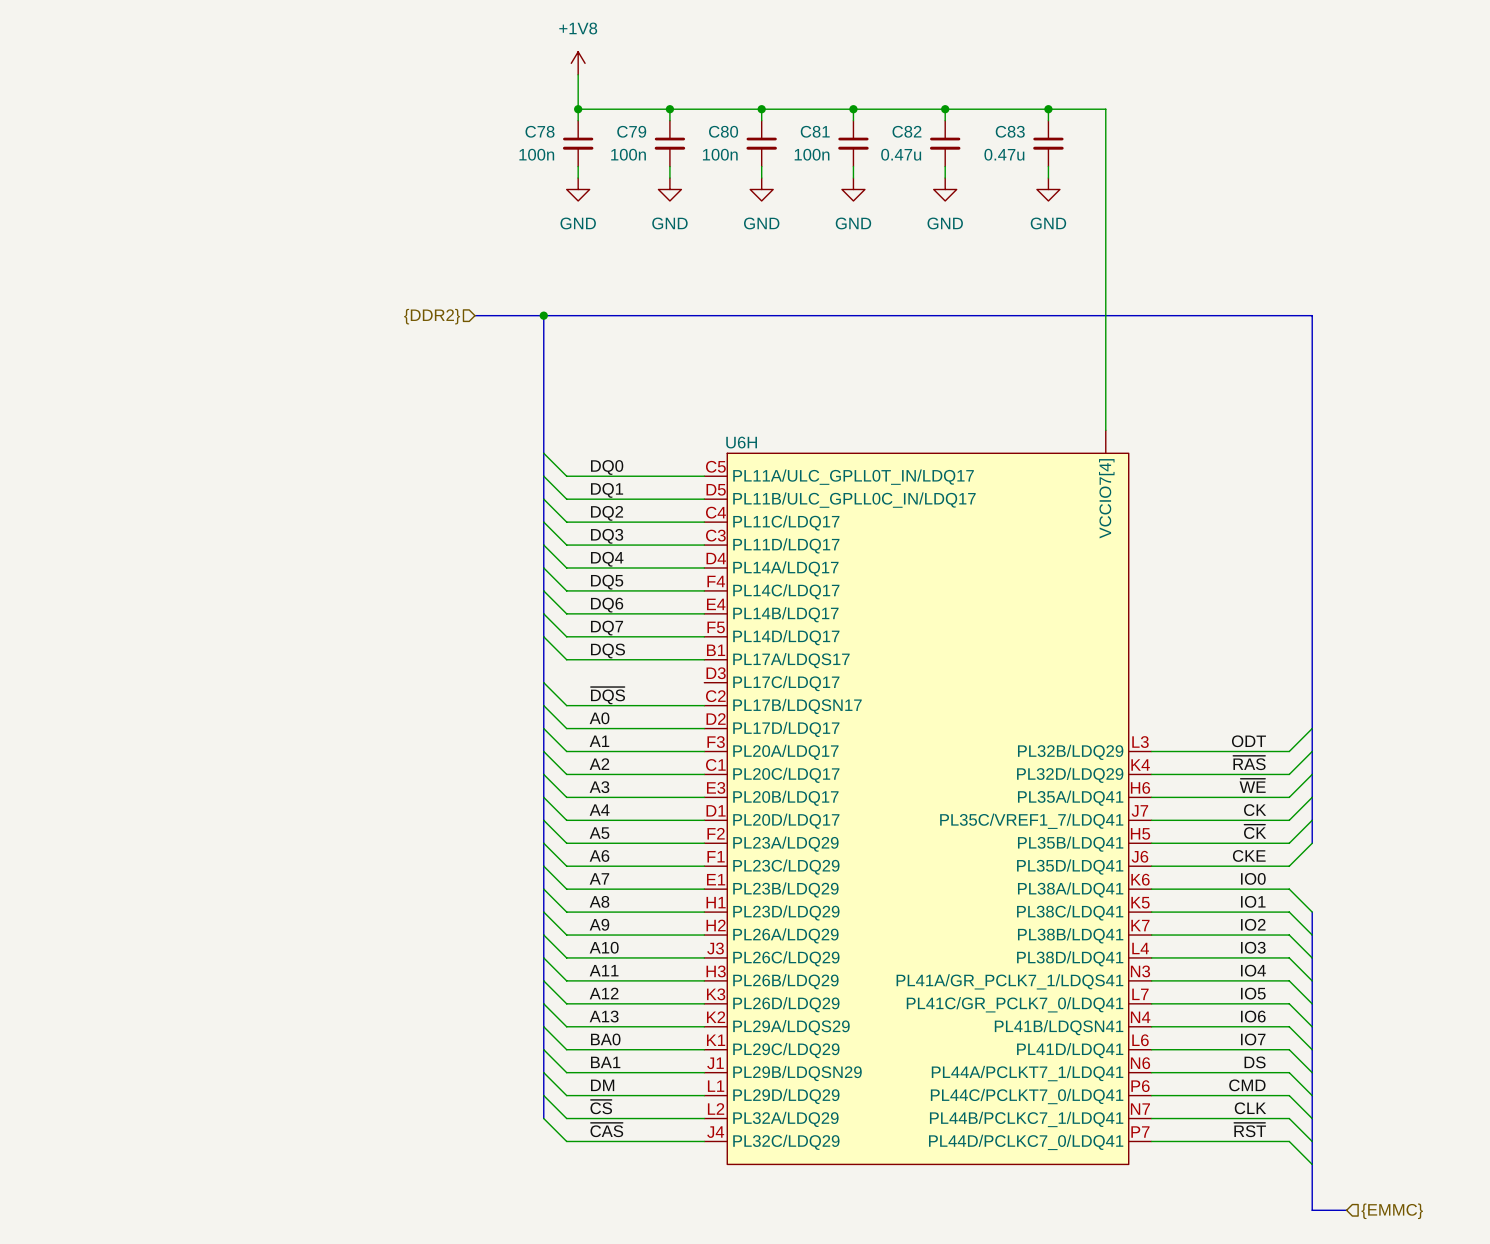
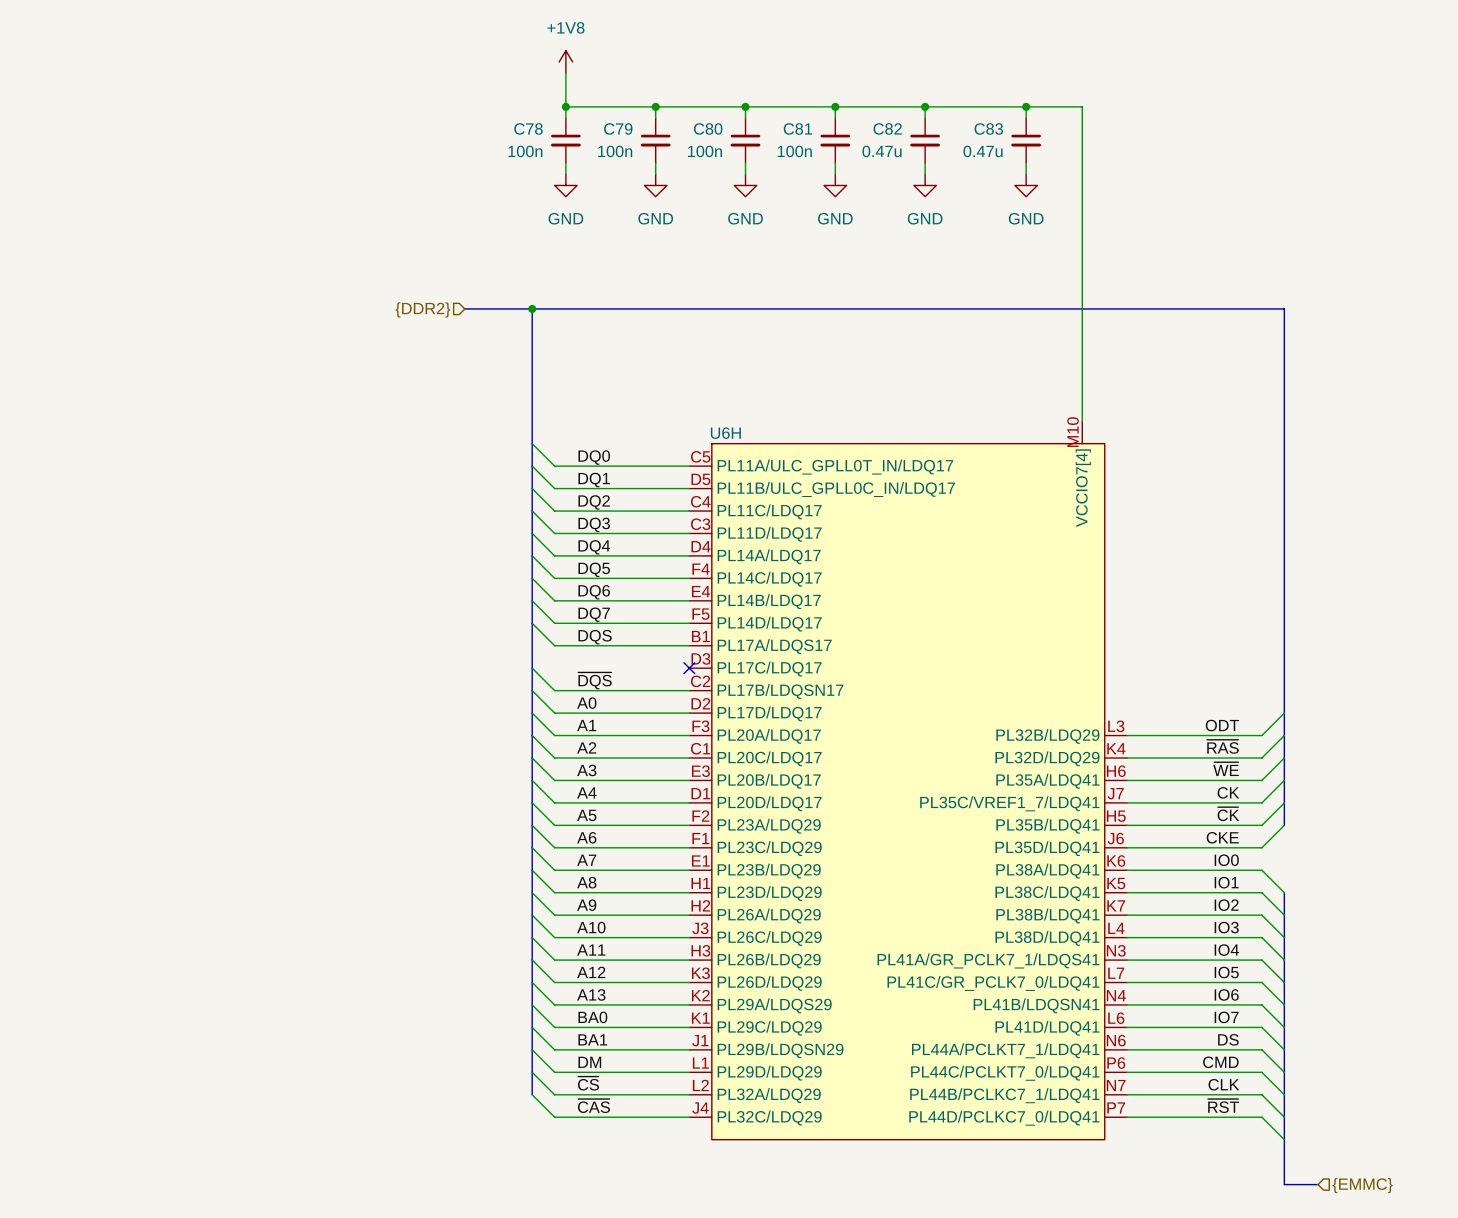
U6H pin number: none -> M10 (1073, 432)
no-connect mark: none -> (689, 668)

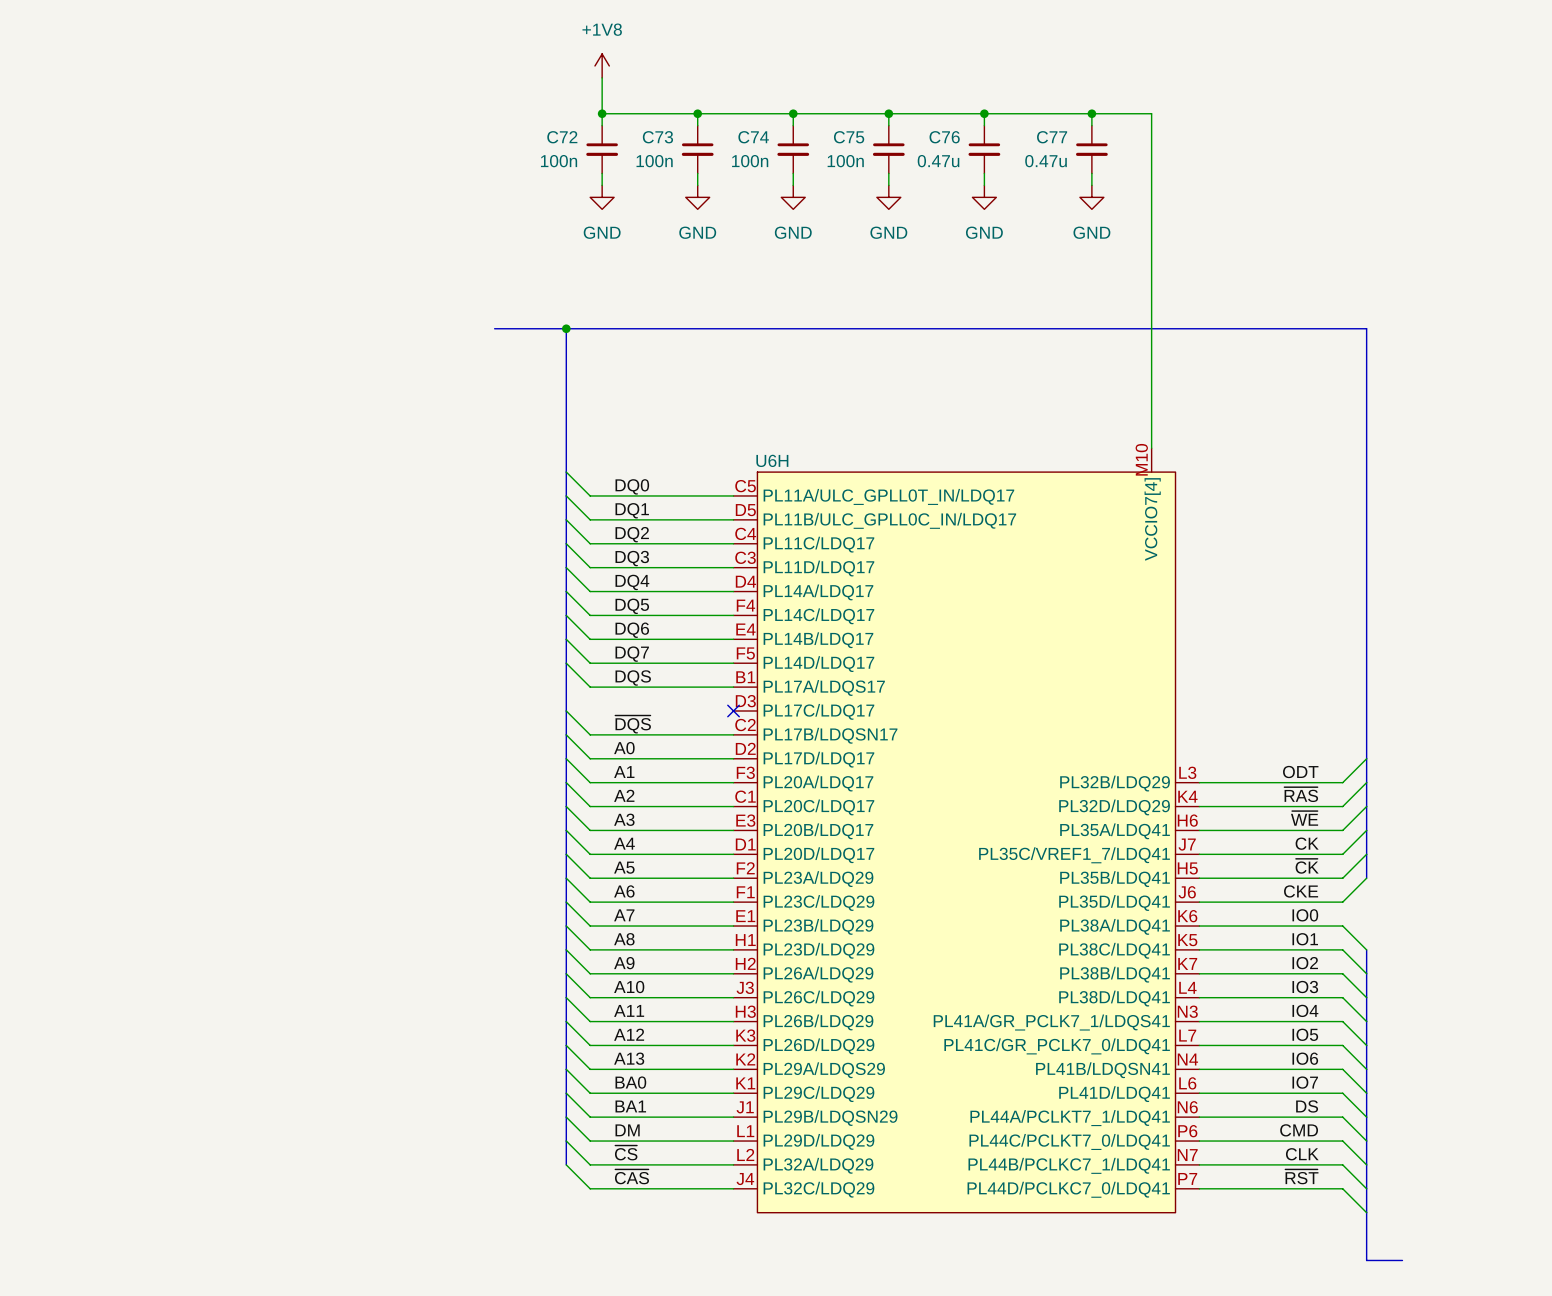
C78 name: C78 (528, 128) -> C72 (562, 137)
C79 name: C79 (618, 128) -> C73 (657, 137)
C80 name: C80 (708, 128) -> C74 (753, 137)
C81 name: C81 (797, 128) -> C75 (849, 137)
C82 name: C82 (887, 128) -> C76 (944, 137)
C83 name: C83 (988, 128) -> C77 (1052, 137)
hierarchical label: {DDR2} (422, 309) -> none
hierarchical label: {EMMC} (1362, 1185) -> none

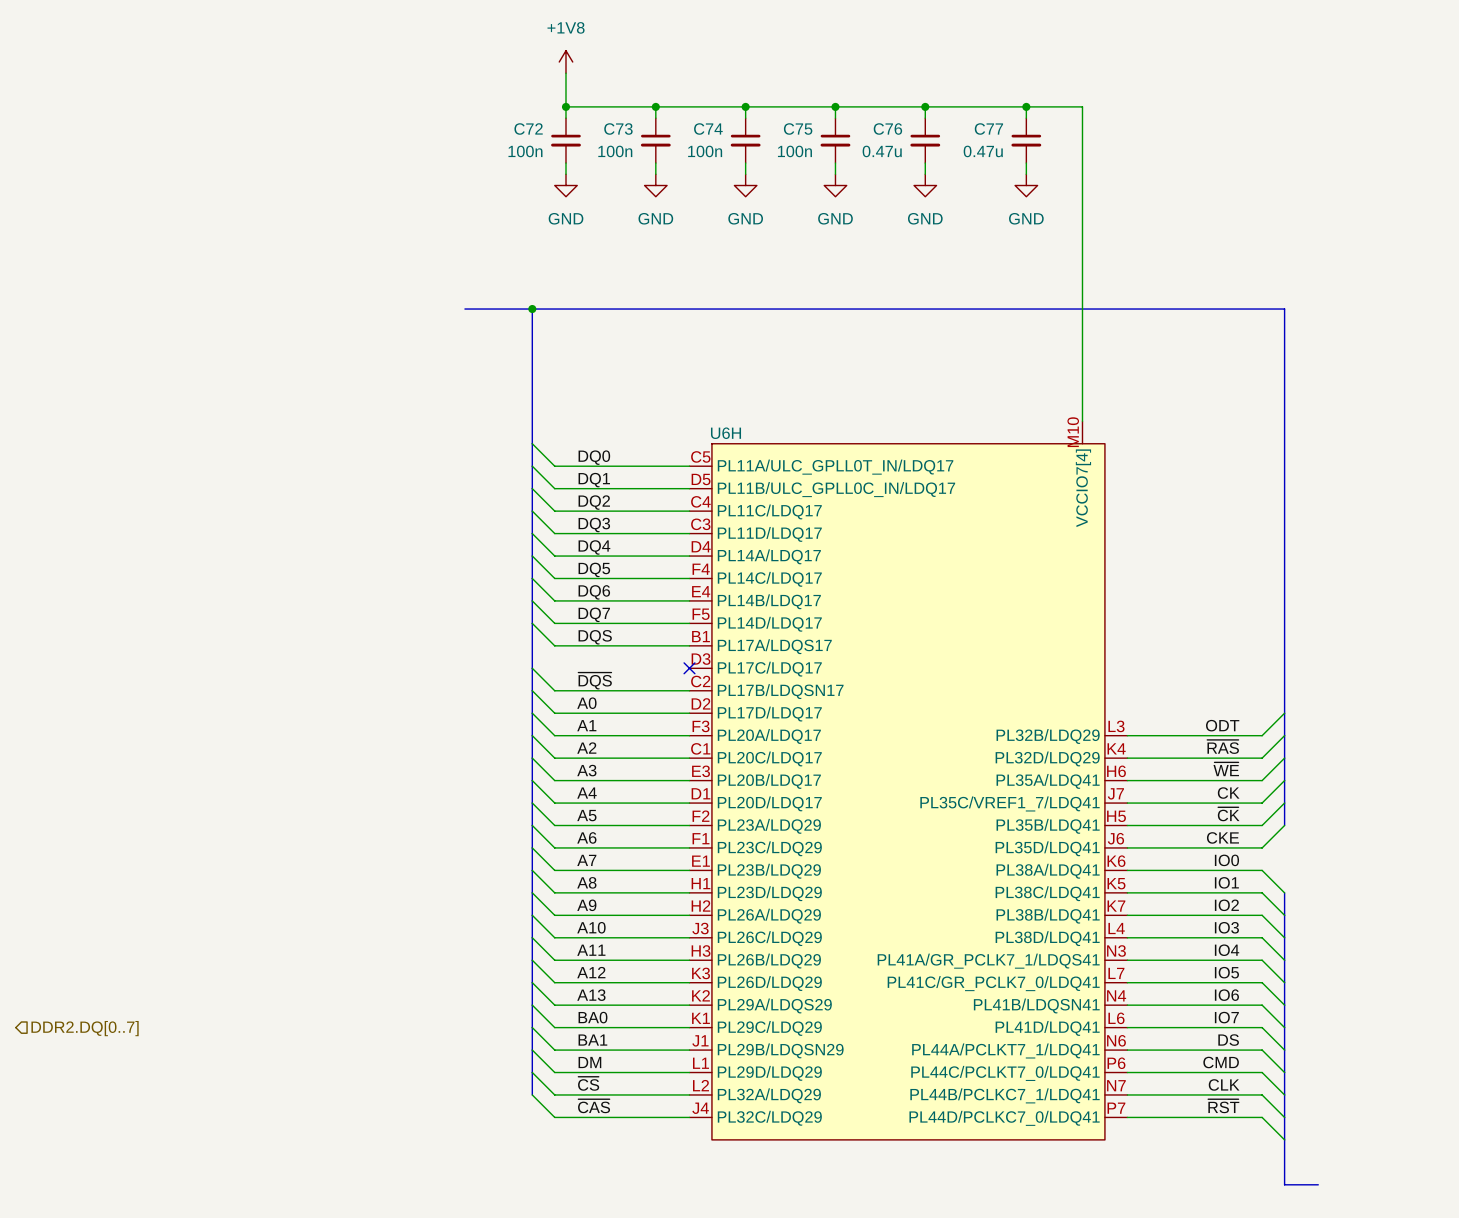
hierarchical label: none -> DDR2.DQ[0..7] (85, 1028)

